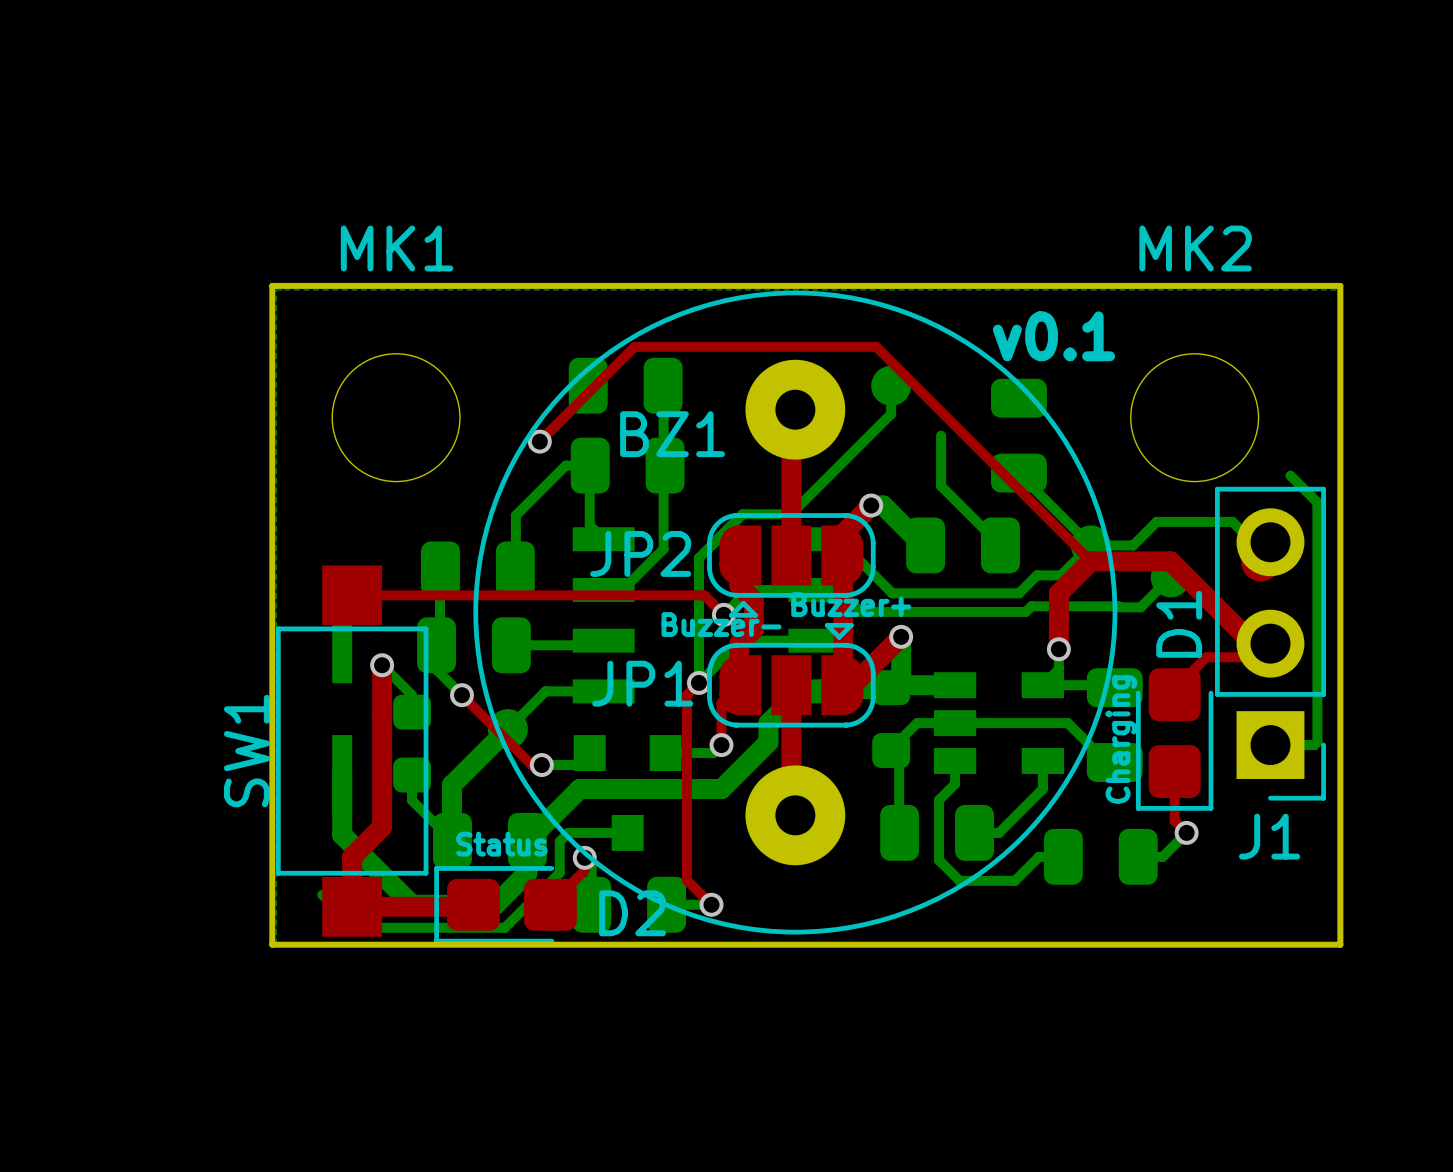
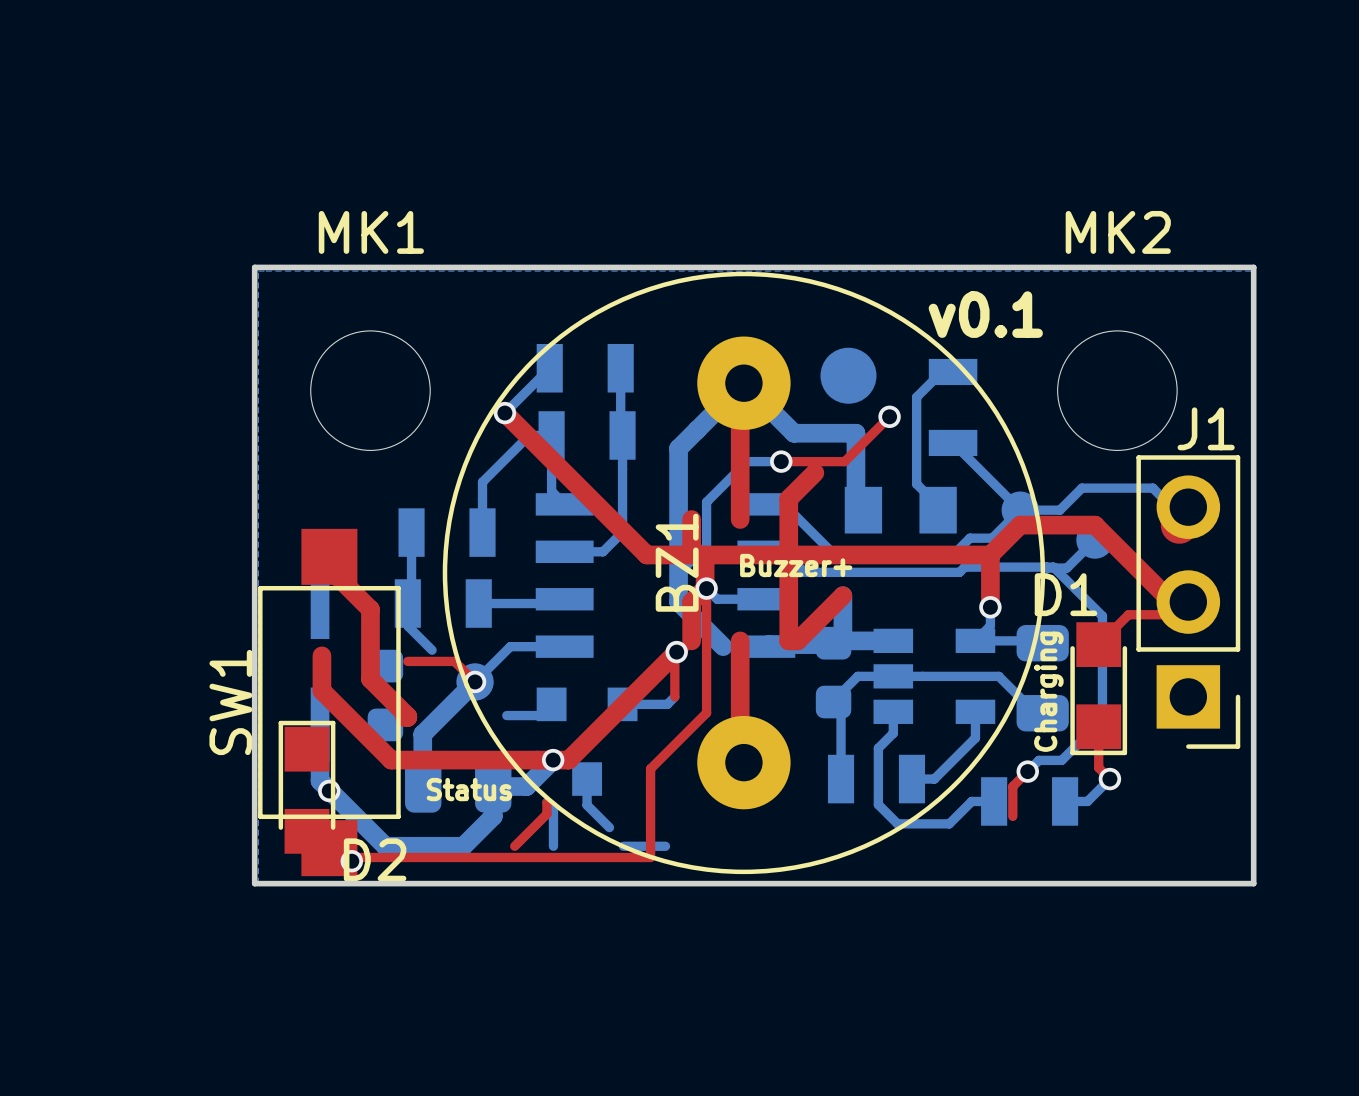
part footprint: [568, 357, 683, 414] -> [536, 343, 634, 393]
part footprint: [871, 365, 912, 406] -> [820, 347, 877, 404]
part footprint: [991, 378, 1047, 493] -> [928, 358, 978, 457]
bottom track: (891, 385) (891, 413) (790, 514) (742, 514) (698, 557) (698, 682) (741, 640) (766, 640) -> (781, 461) (747, 461) (706, 502) (706, 588) (717, 599)
bottom track: none -> (953, 371) (941, 371) (916, 397) (916, 484) (938, 505)
BZ1 name rotation: 0° (672, 434) -> 90° counterclockwise (677, 562)
BZ1 name position: BZ1 (672, 434) -> BZ1 (677, 562)
bottom track: (941, 435) (941, 486) (1000, 545) -> none
part footprint: [570, 437, 685, 494] -> [538, 411, 636, 460]
top track: (539, 441) (634, 346) (876, 346) (1090, 561) -> (504, 413) (646, 554) (990, 554)
top track: none -> (889, 416) (844, 461) (781, 461)
via: none -> (889, 416)
bottom track: (663, 463) (663, 549) (622, 589) -> (620, 433) (622, 435) (622, 532) (602, 551) (582, 551)
bottom track: (1290, 475) (1317, 502) (1317, 742) (1314, 745) (1270, 745) -> none
bottom track: (871, 505) (883, 505) (915, 537) -> (723, 646) (678, 602) (678, 448) (743, 383) (793, 433) (855, 433) (855, 502)
via position: (871, 505) -> (781, 461)
part footprint: [906, 517, 1020, 574] -> [844, 486, 957, 534]
part footprint: [421, 541, 535, 598] -> [398, 508, 496, 557]
JP2: (791, 565) -> none
top track: (352, 595) (704, 595) (723, 614) -> none
top track: none -> (321, 560) (370, 609) (370, 679) (407, 716) (404, 717)
bottom track: none -> (1046, 567) (1053, 567) (1102, 616) (1102, 719) (1061, 760) (1038, 760) (1027, 771)
via position: (723, 614) -> (706, 588)
part footprint: [417, 617, 531, 674] -> [394, 579, 492, 628]
text: Buzzer- (721, 624) -> none
D1 name rotation: 0° (1179, 624) -> 90° clockwise (1065, 594)
top track: none -> (706, 588) (706, 712) (650, 768) (650, 857) (355, 857) (351, 861)
via: (901, 636) -> none
bottom track: (382, 665) (412, 695) -> none
top track: (382, 665) (382, 826) (352, 856) (352, 906) (471, 906) (473, 904) -> none
via: (382, 665) -> none
D1 footprint: [1135, 668, 1214, 811] -> [1070, 622, 1128, 756]
JP1: (791, 675) -> none
top track: (698, 682) (686, 694) (686, 880) (711, 904) -> none
via: (698, 682) -> none
bottom track: (800, 691) (768, 723) (768, 742) (721, 789) (579, 789) (527, 840) -> (553, 760) (526, 786) (493, 786)
top track: (461, 695) (531, 765) (541, 765) -> none
via: (461, 695) -> none
top track: none -> (676, 652) (568, 760) (391, 760) (321, 690) (321, 655)
via: none -> (676, 652)
top track: none -> (407, 661) (454, 661) (475, 681)
via: none -> (475, 681)
via: (721, 745) -> none
via: (541, 765) -> none
bottom track: (412, 785) (412, 800) (452, 840) -> none
part footprint: [880, 804, 995, 861] -> [827, 754, 926, 804]
via: none -> (553, 760)
top track: none -> (1027, 771) (1012, 786) (1012, 816)
via: none -> (1027, 771)
part footprint: [1043, 828, 1158, 885] -> [981, 777, 1079, 826]
bottom track: (627, 832) (568, 832) (559, 841) (559, 872) (504, 927) (355, 927) (322, 894) -> none
bottom track: none -> (587, 780) (587, 779) (587, 805) (609, 827)
J1 name position: J1 (1269, 836) -> J1 (1206, 428)
via: none -> (329, 790)
via: (584, 857) -> none
D2 footprint: [434, 866, 577, 944] -> [278, 720, 336, 854]
part: (629, 904) -> none
via: (711, 904) -> none
D2 name position: D2 (632, 913) -> D2 (375, 859)
via: none -> (351, 861)

